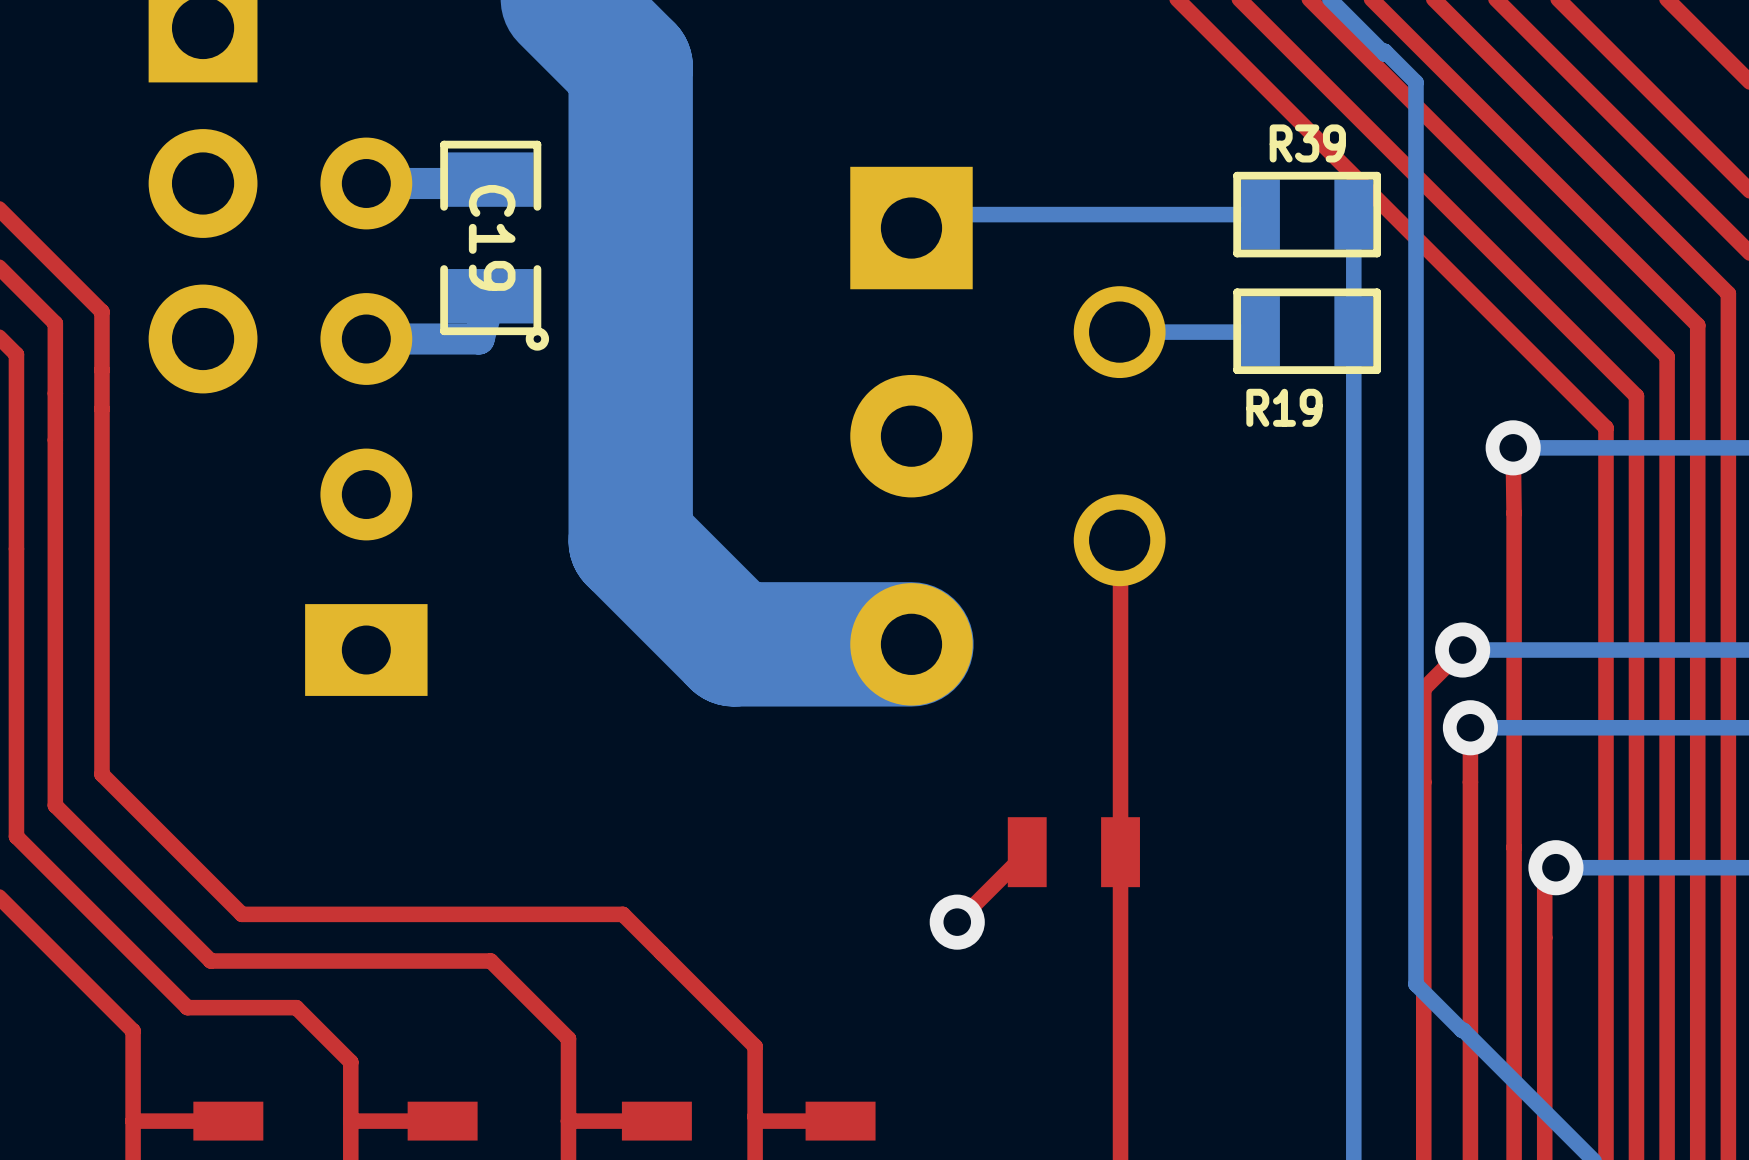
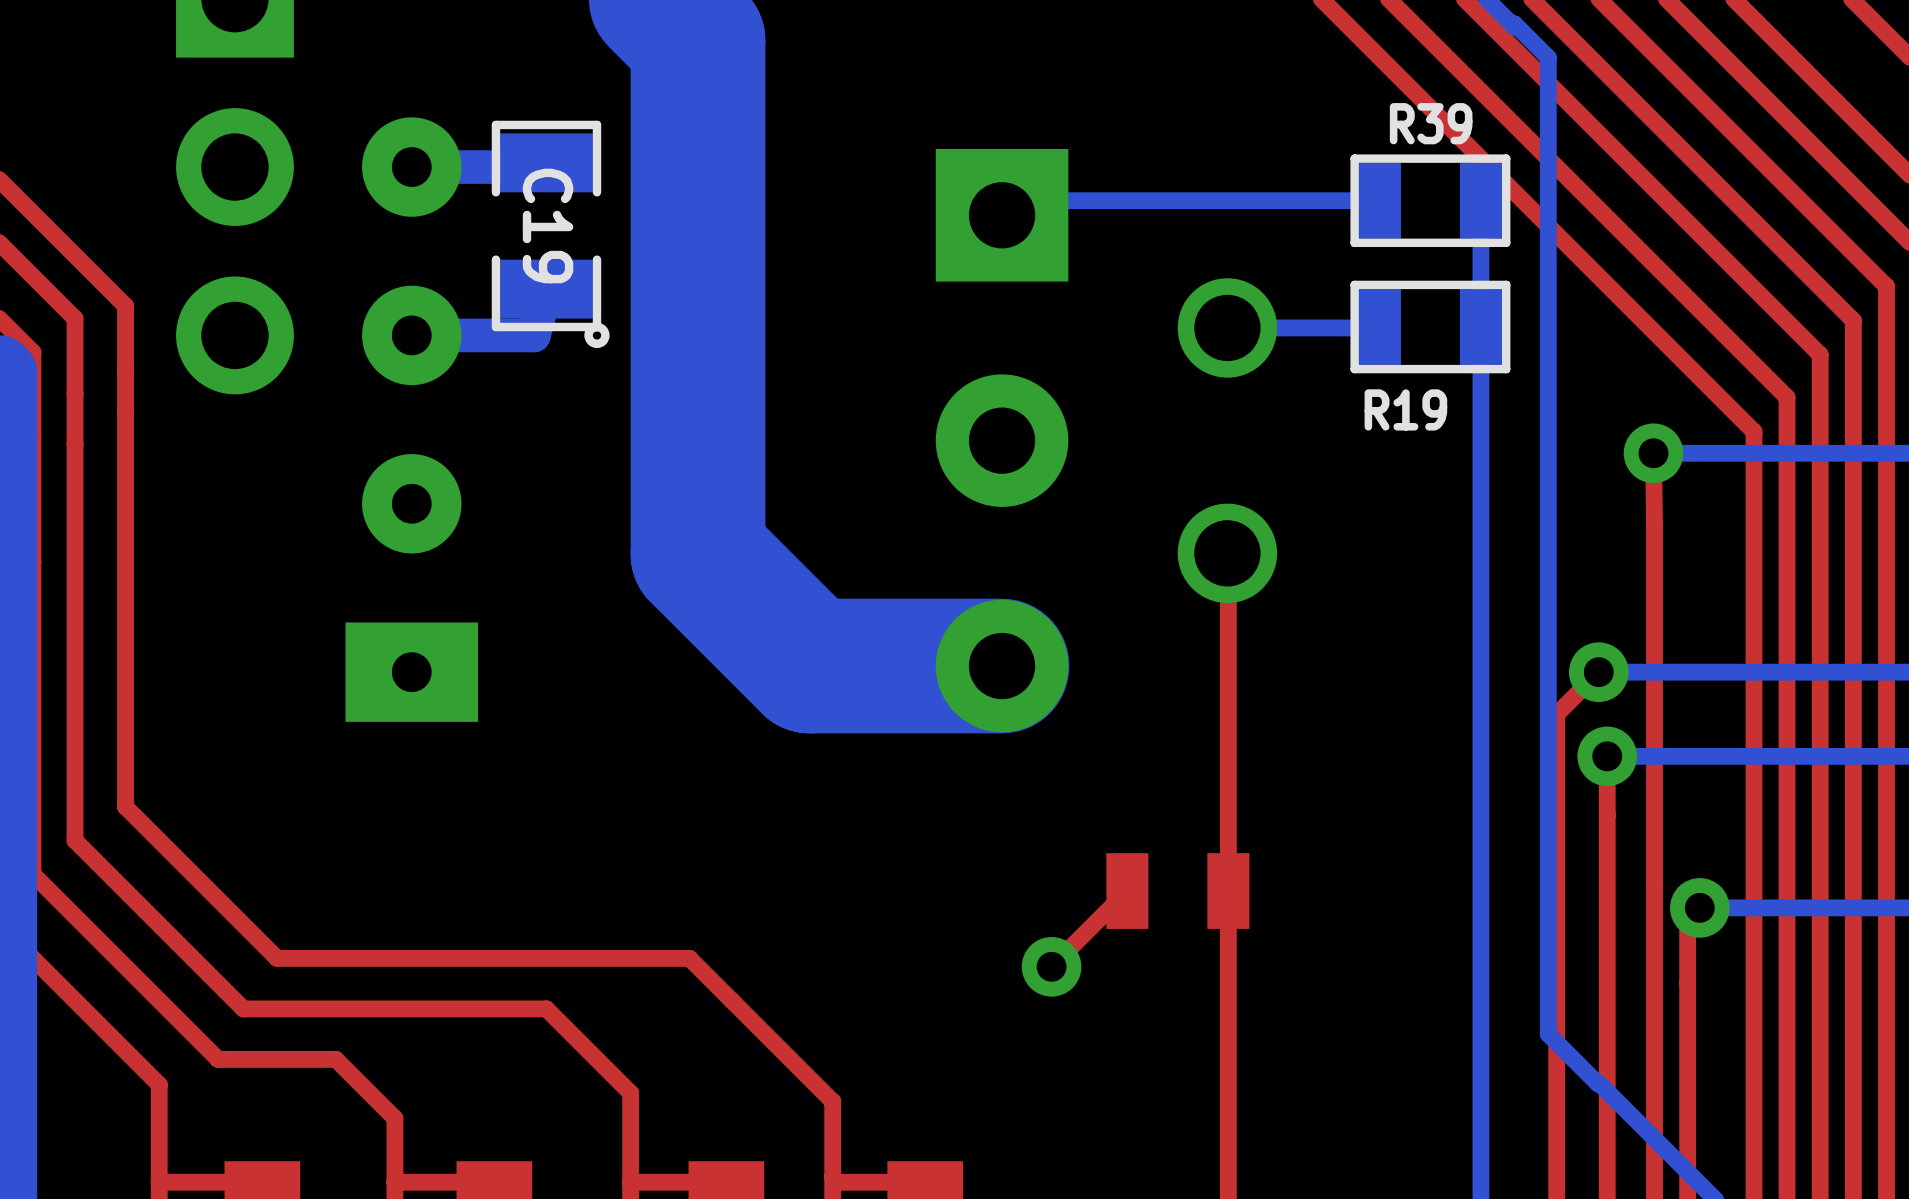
part footprint: [305, 137, 428, 696] -> [345, 117, 479, 722]

